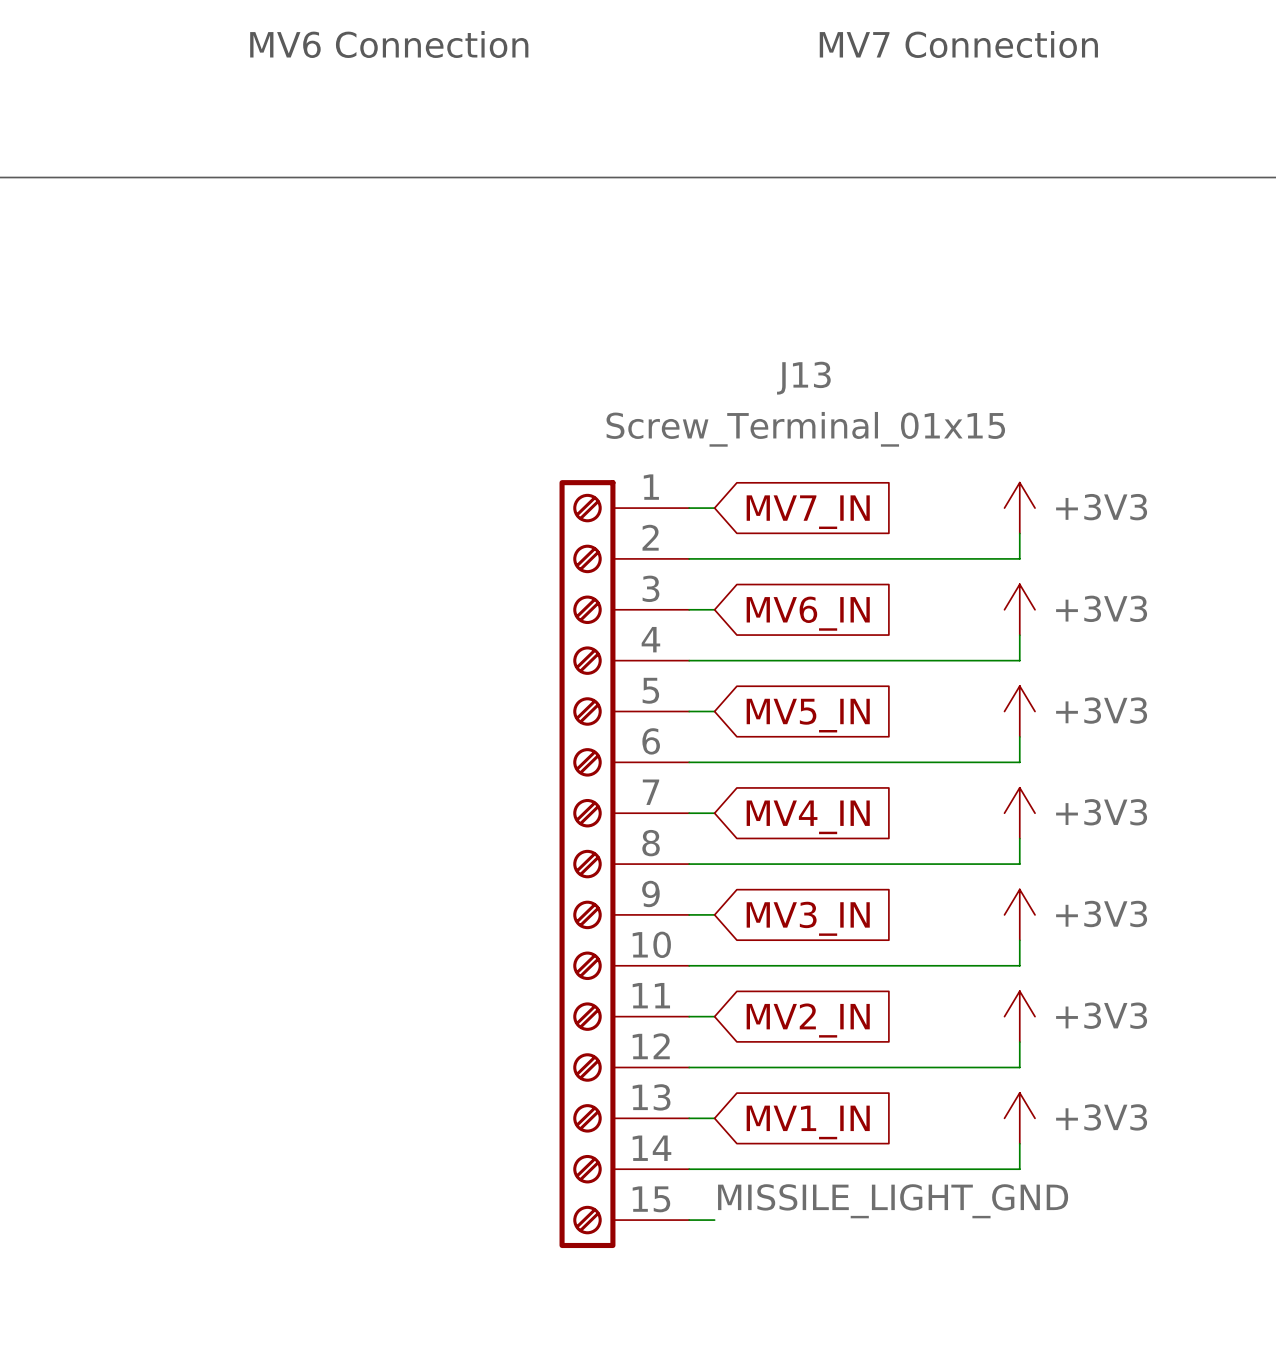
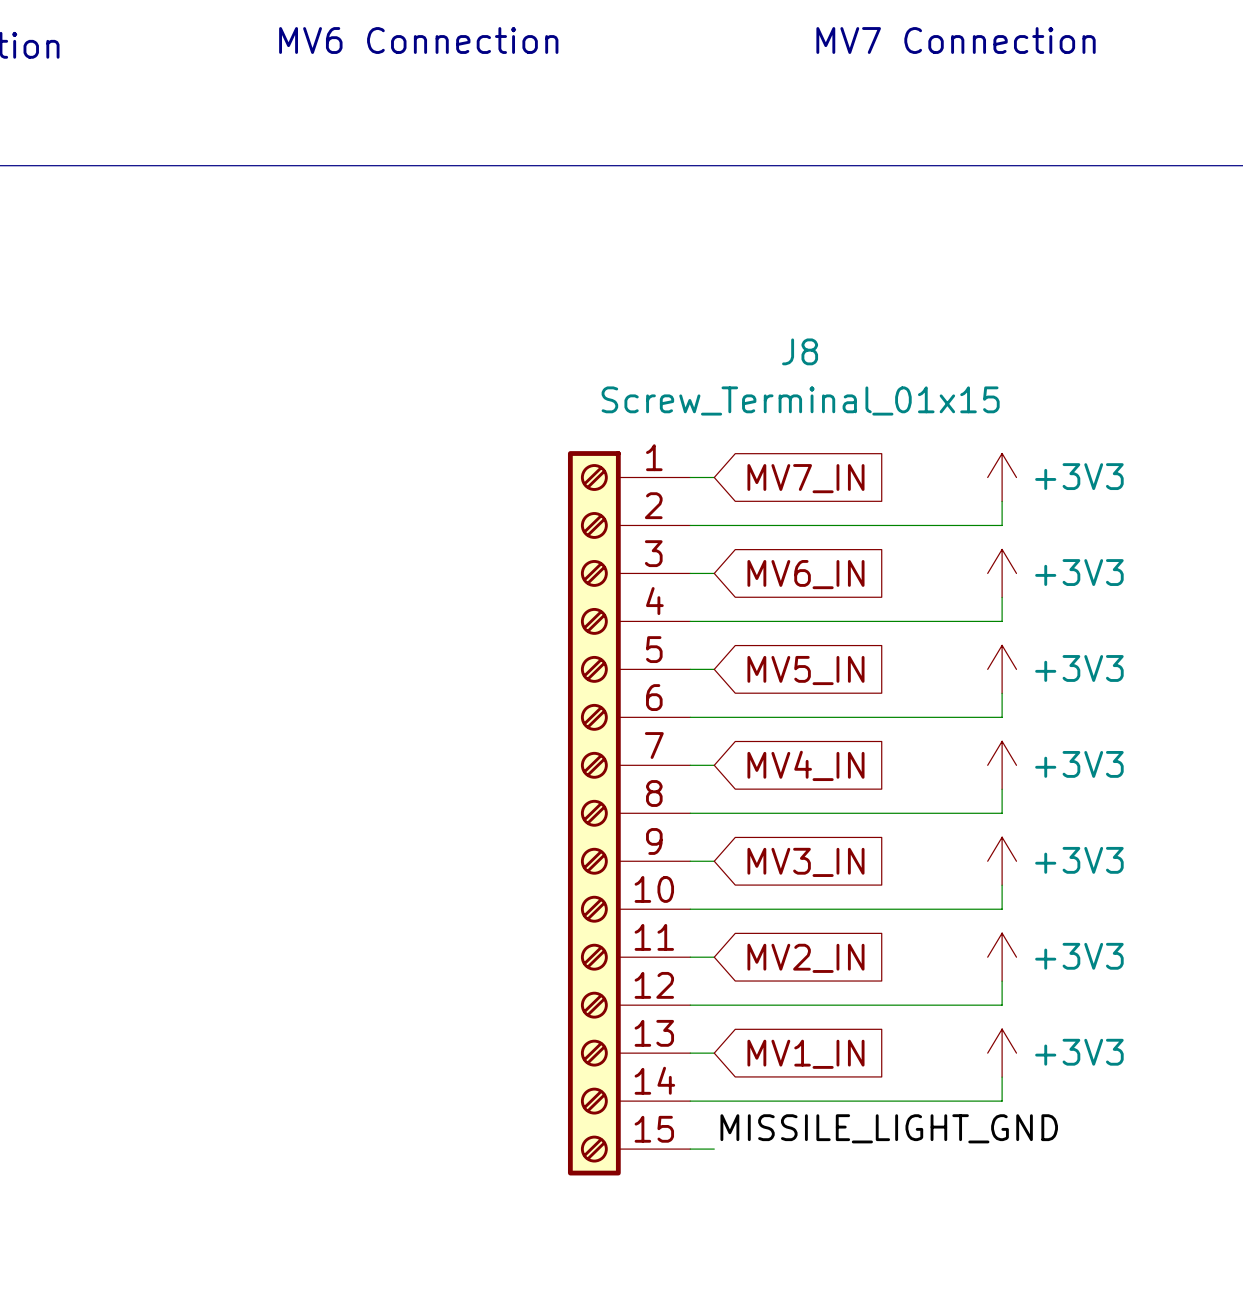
J13 name: J13 (803, 378) -> J8 (800, 351)

